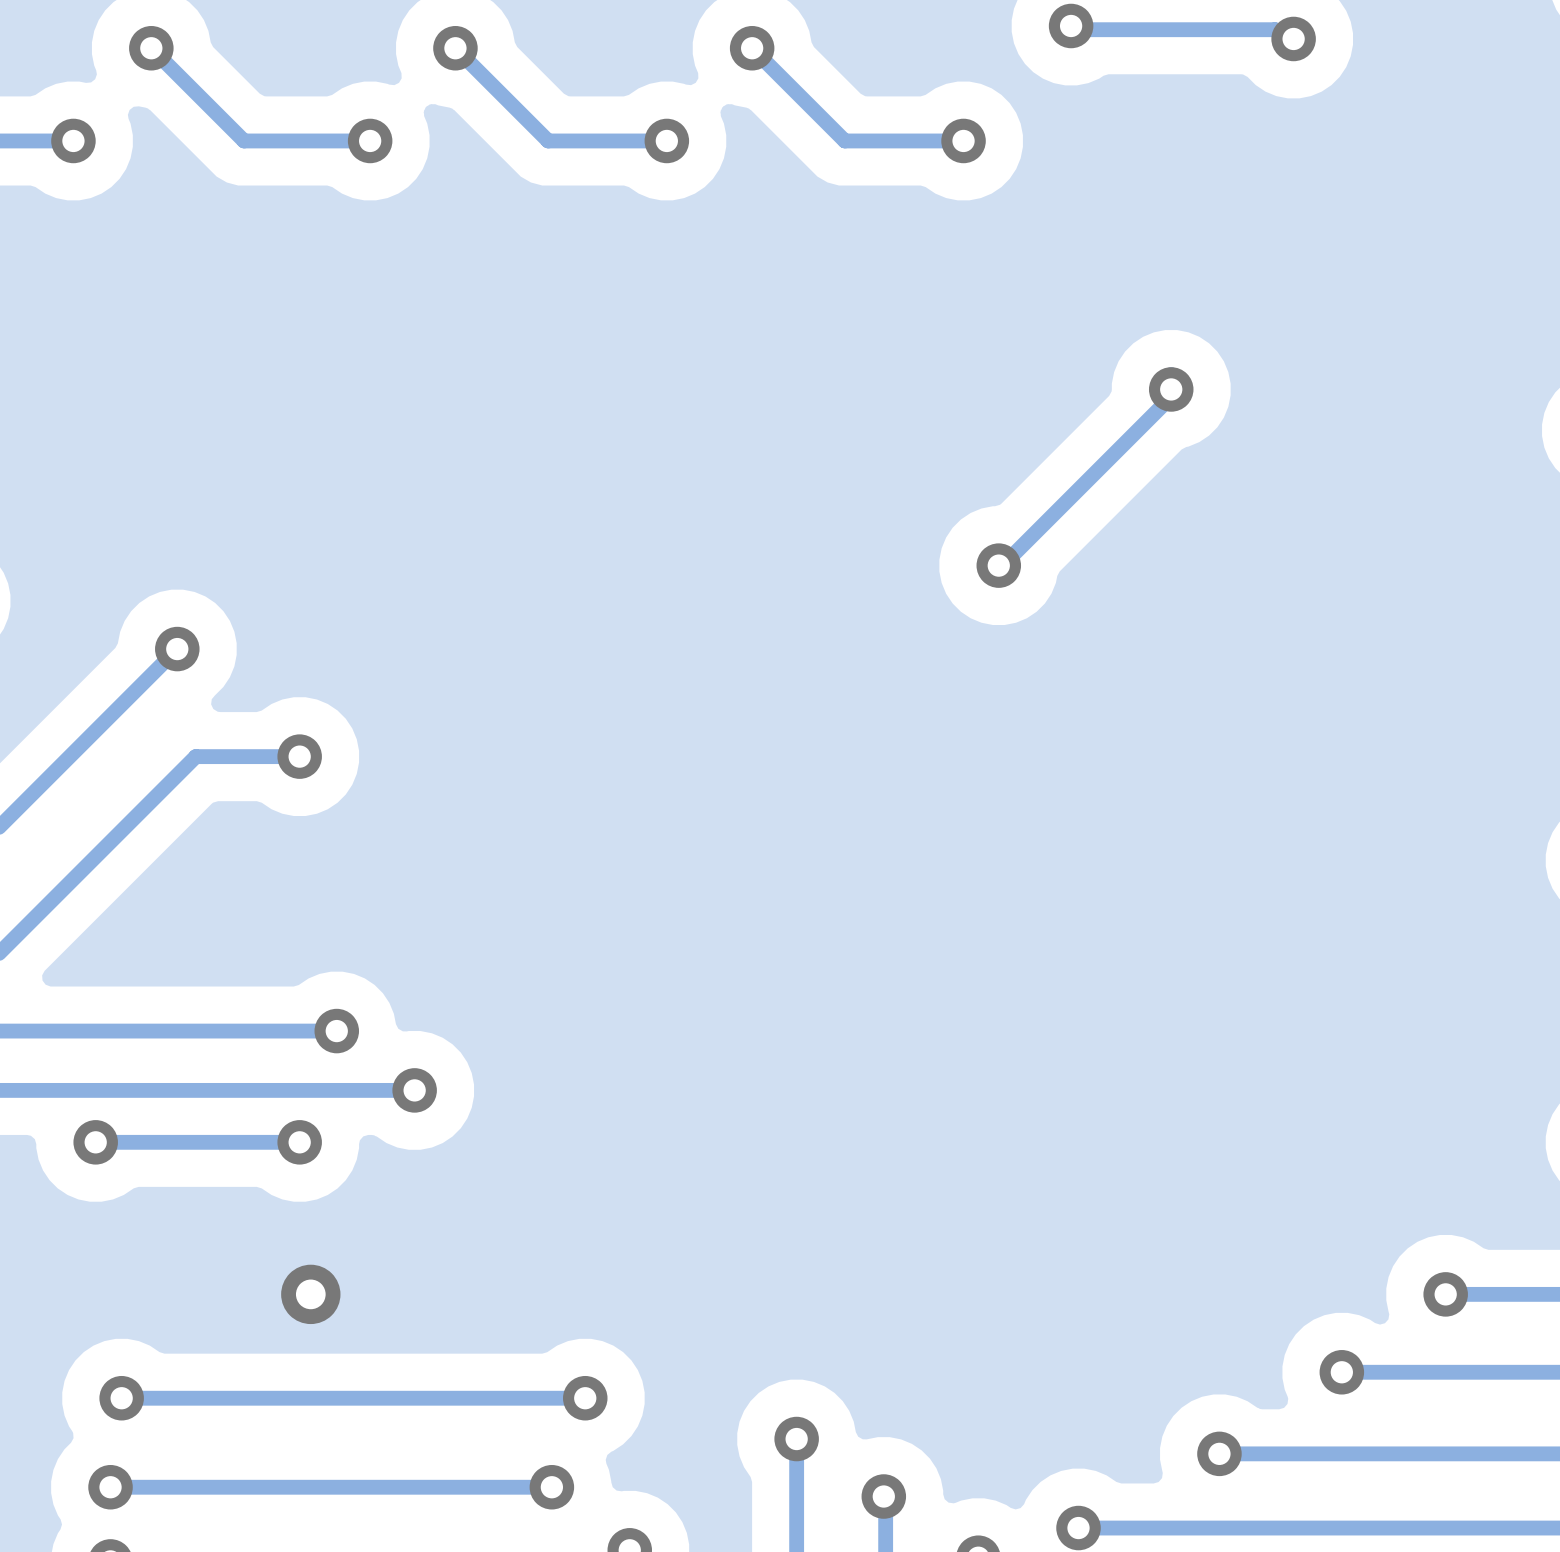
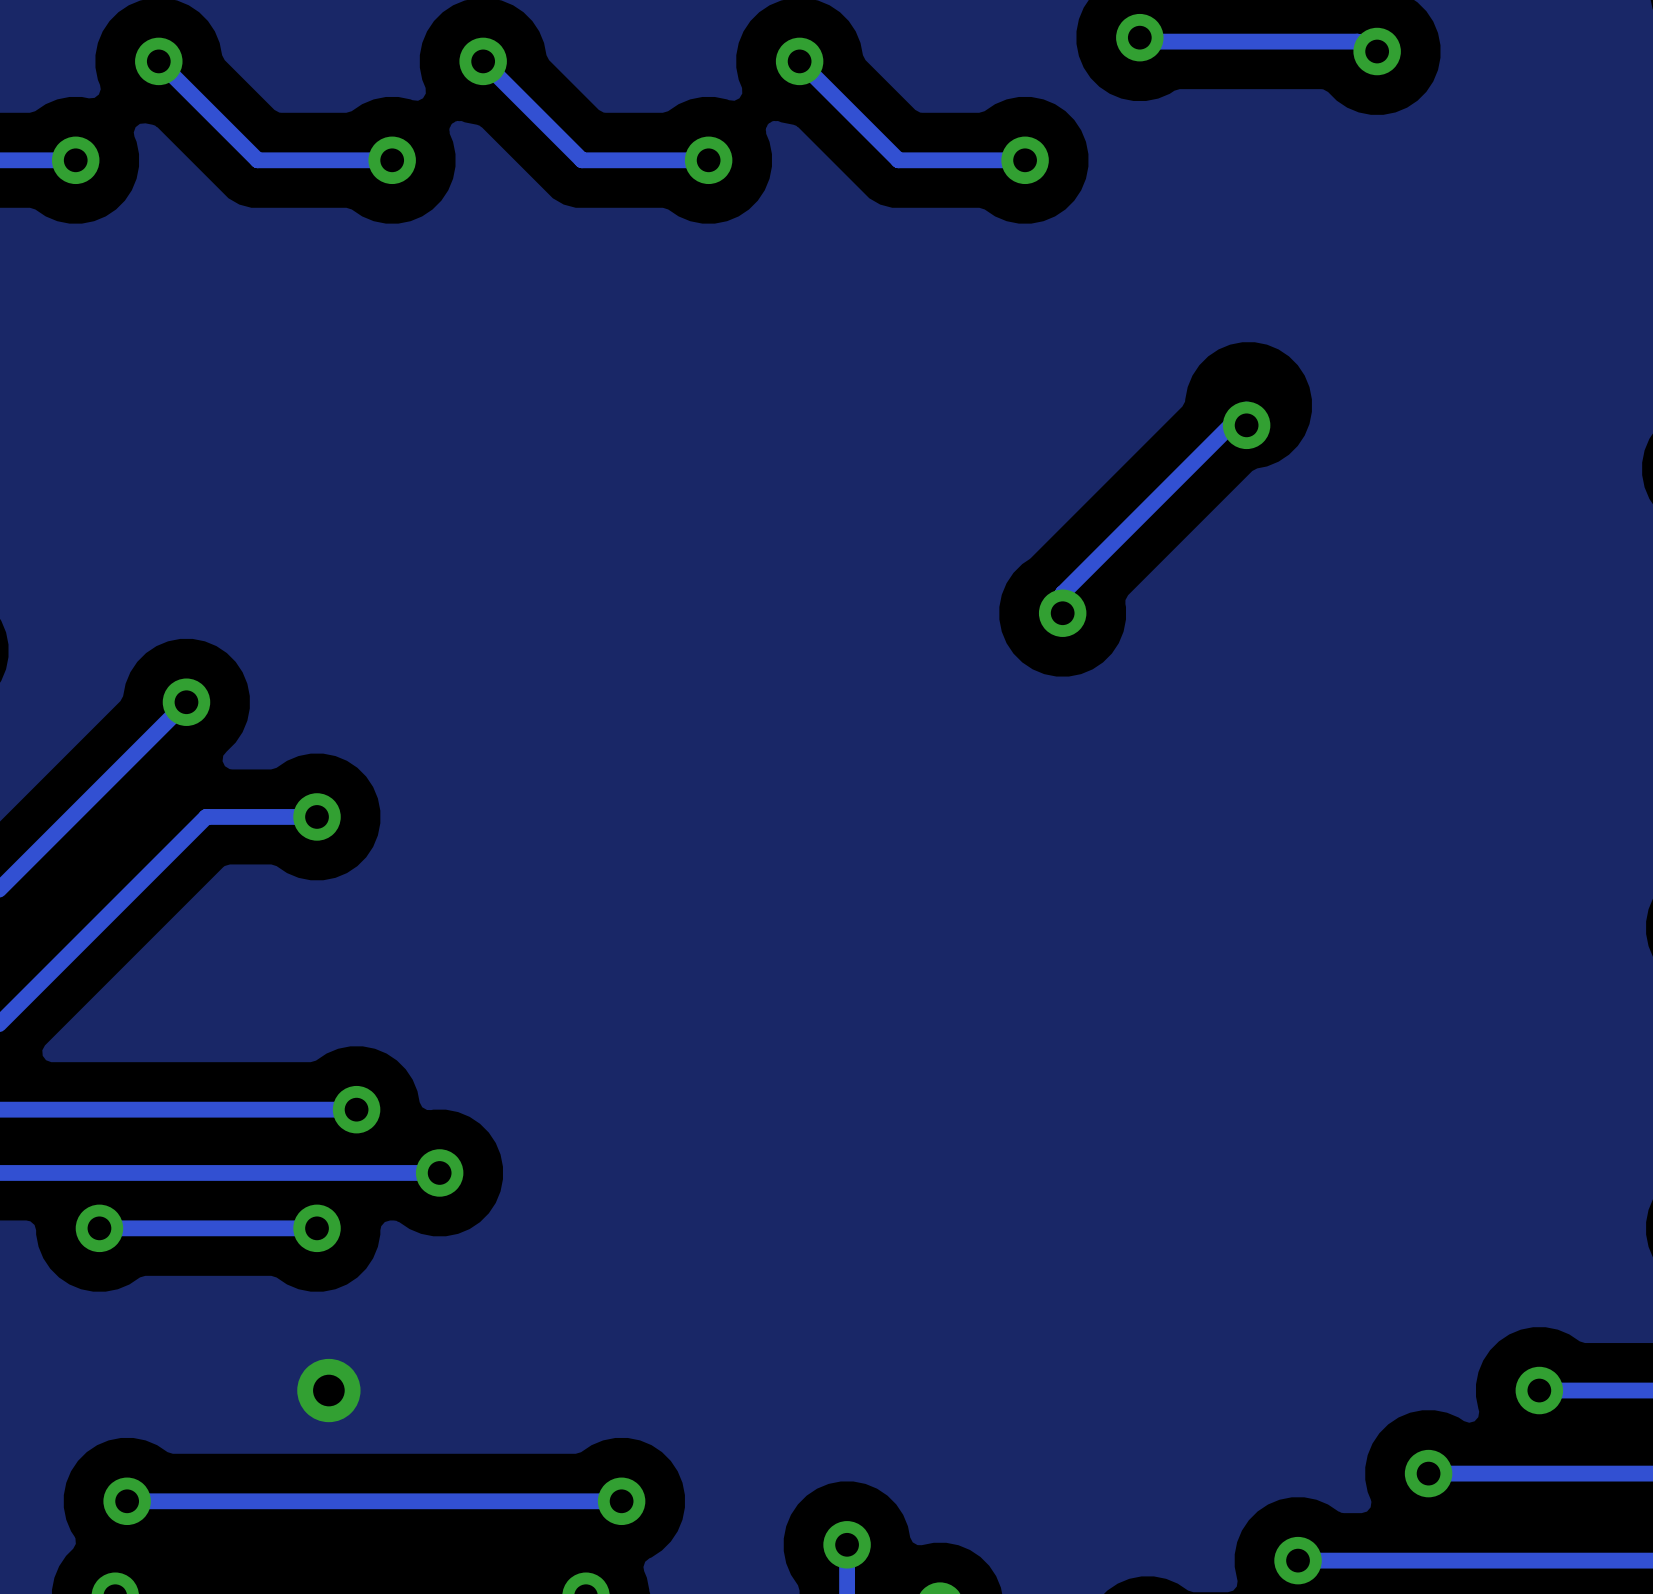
track: (1171, 374) (1171, 396) (1002, 565) (998, 565) -> (1246, 409) (1062, 593) (1062, 613)

